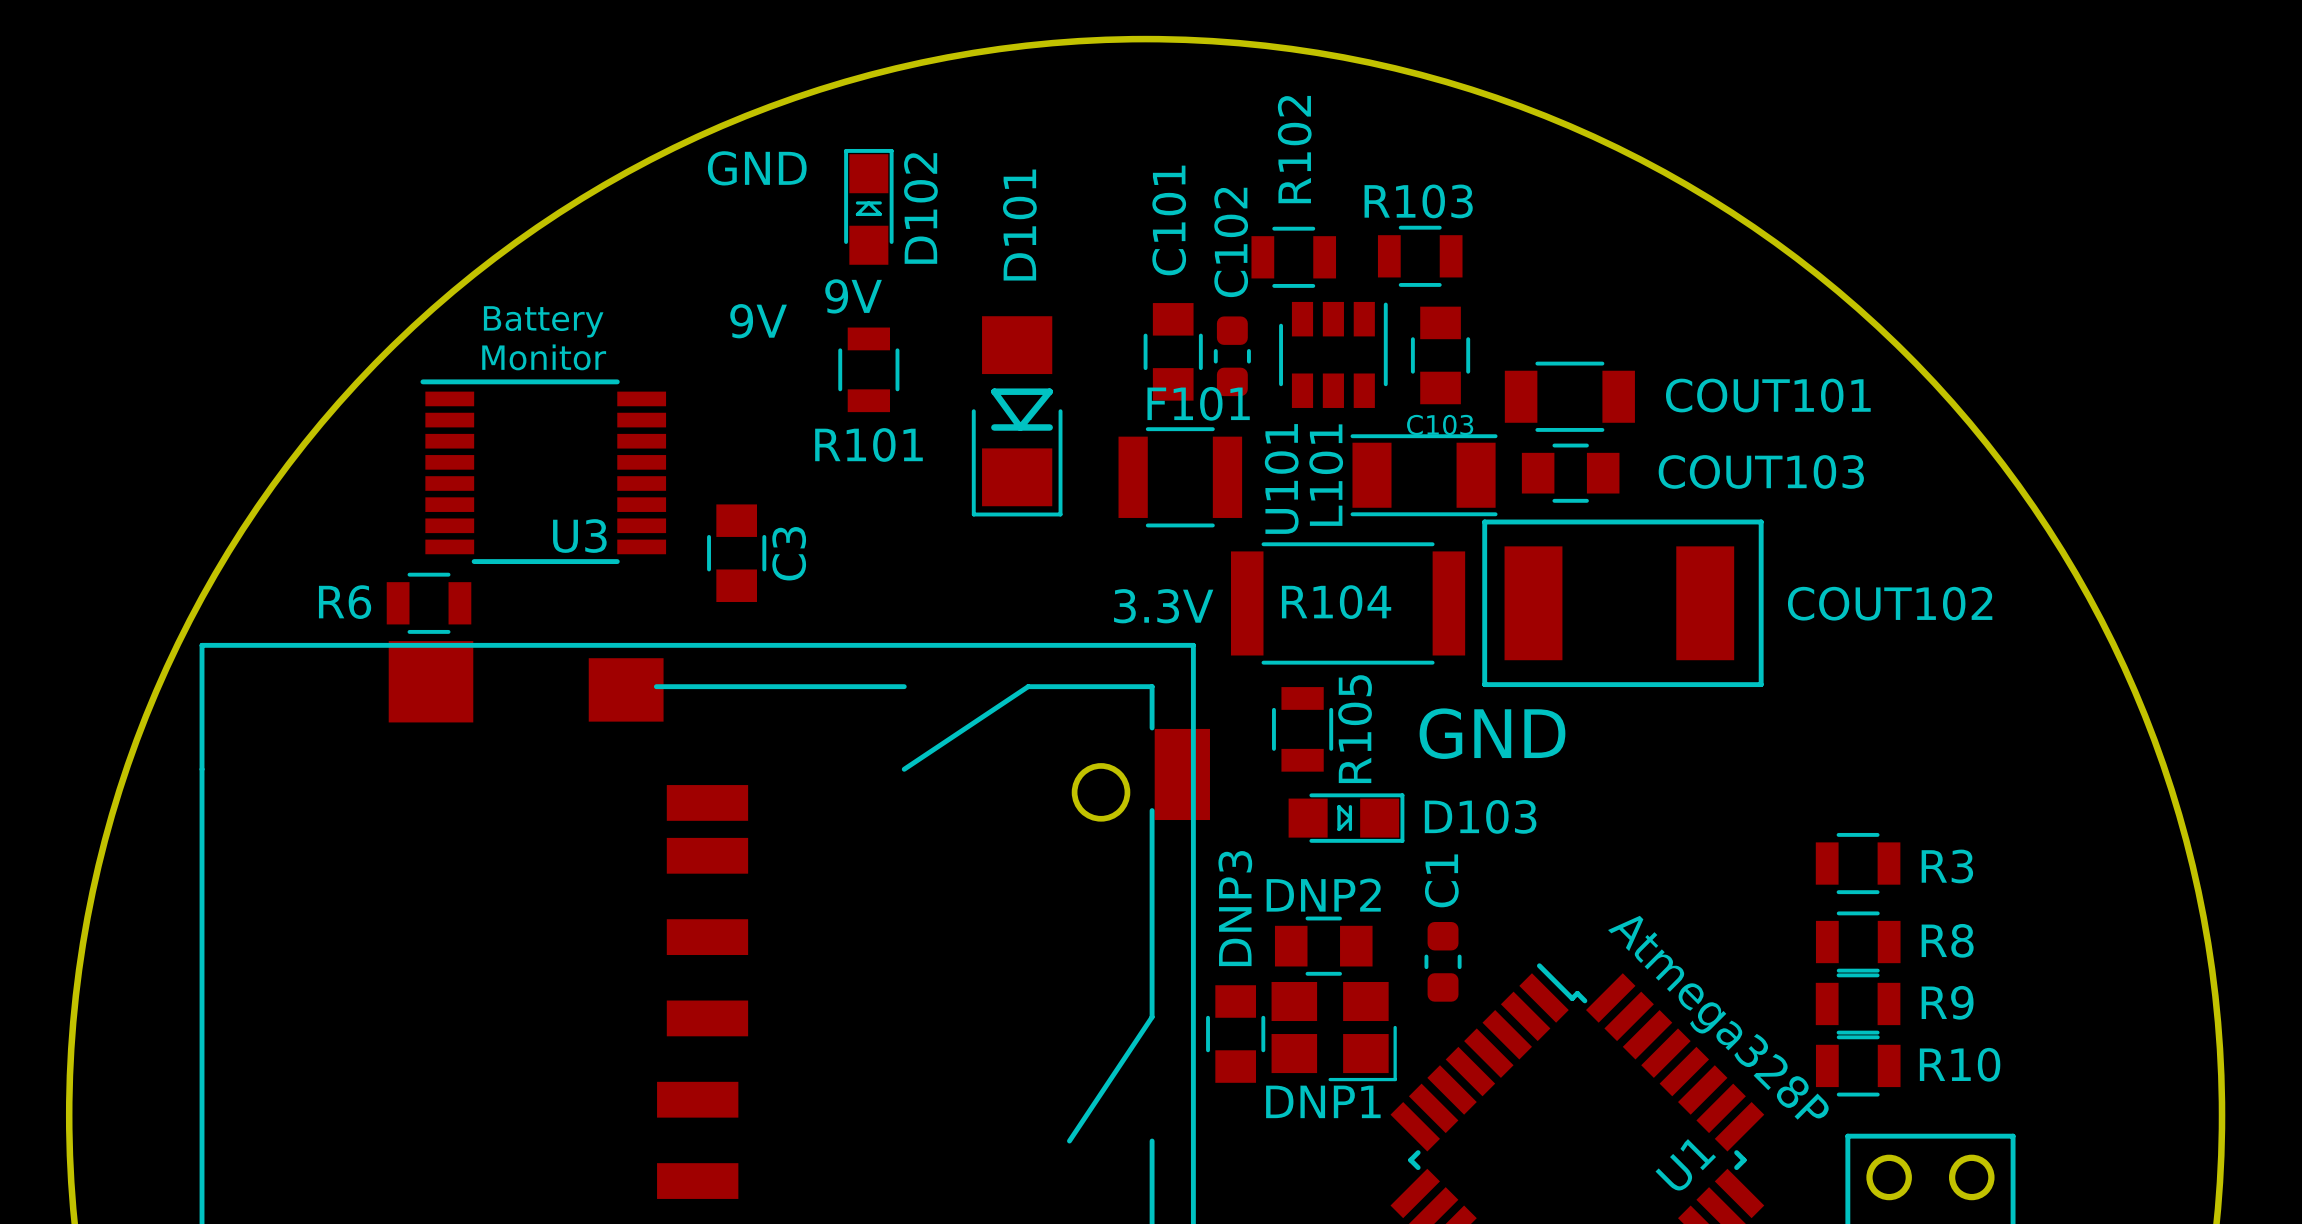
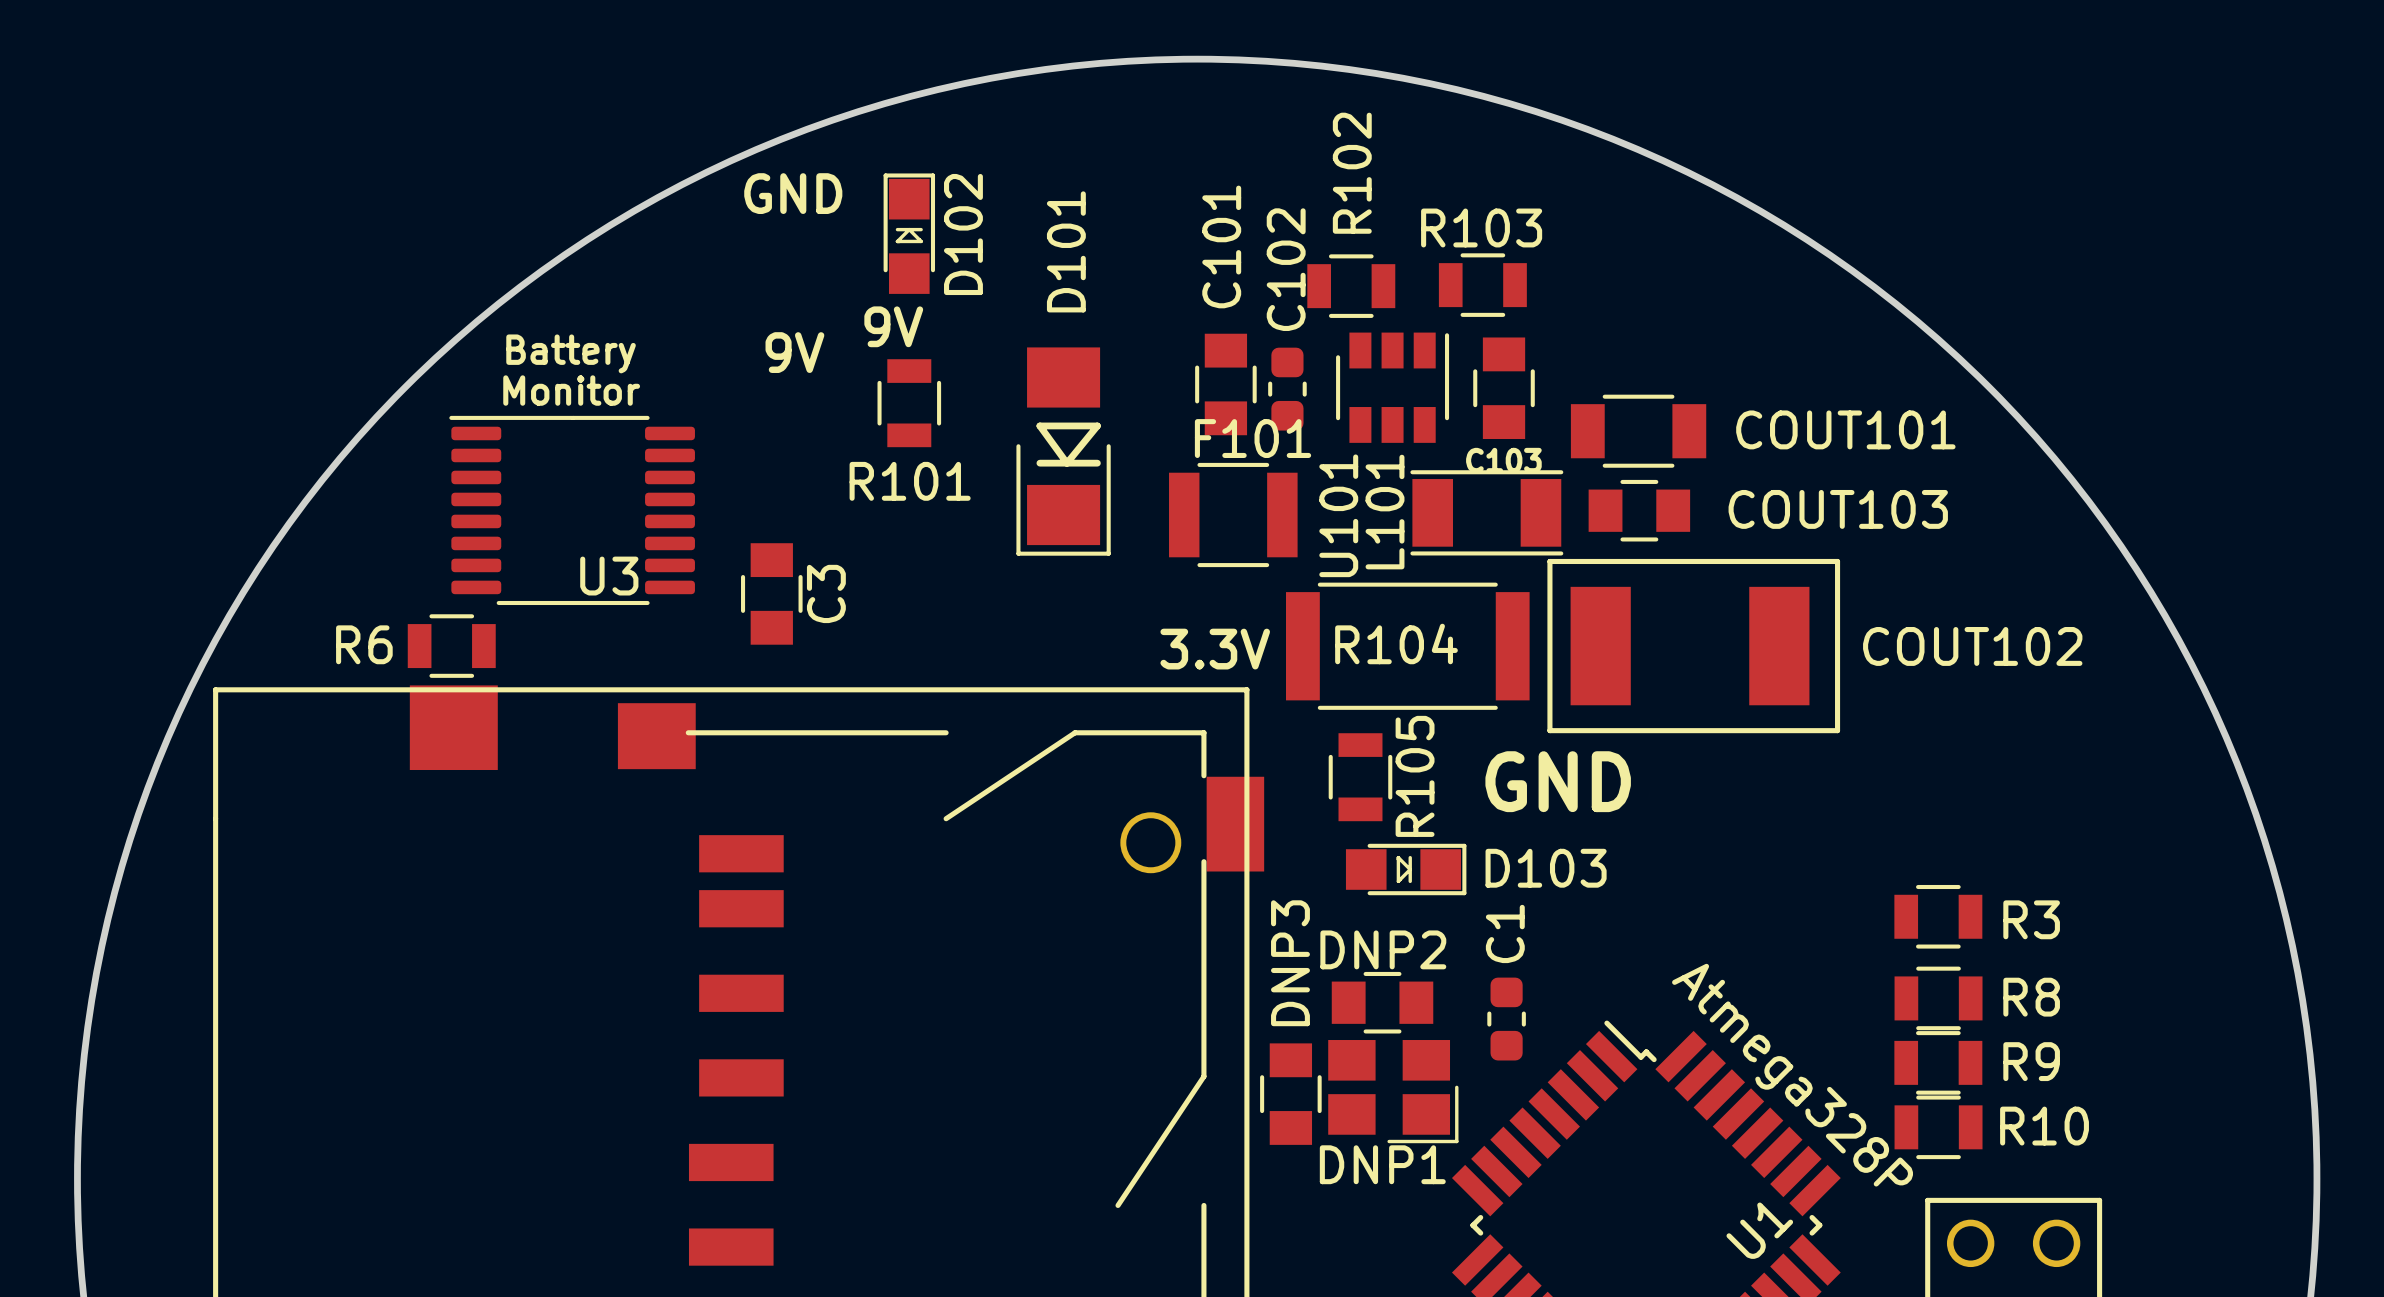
U3 footprint: [420, 379, 667, 565] -> [449, 415, 695, 606]

